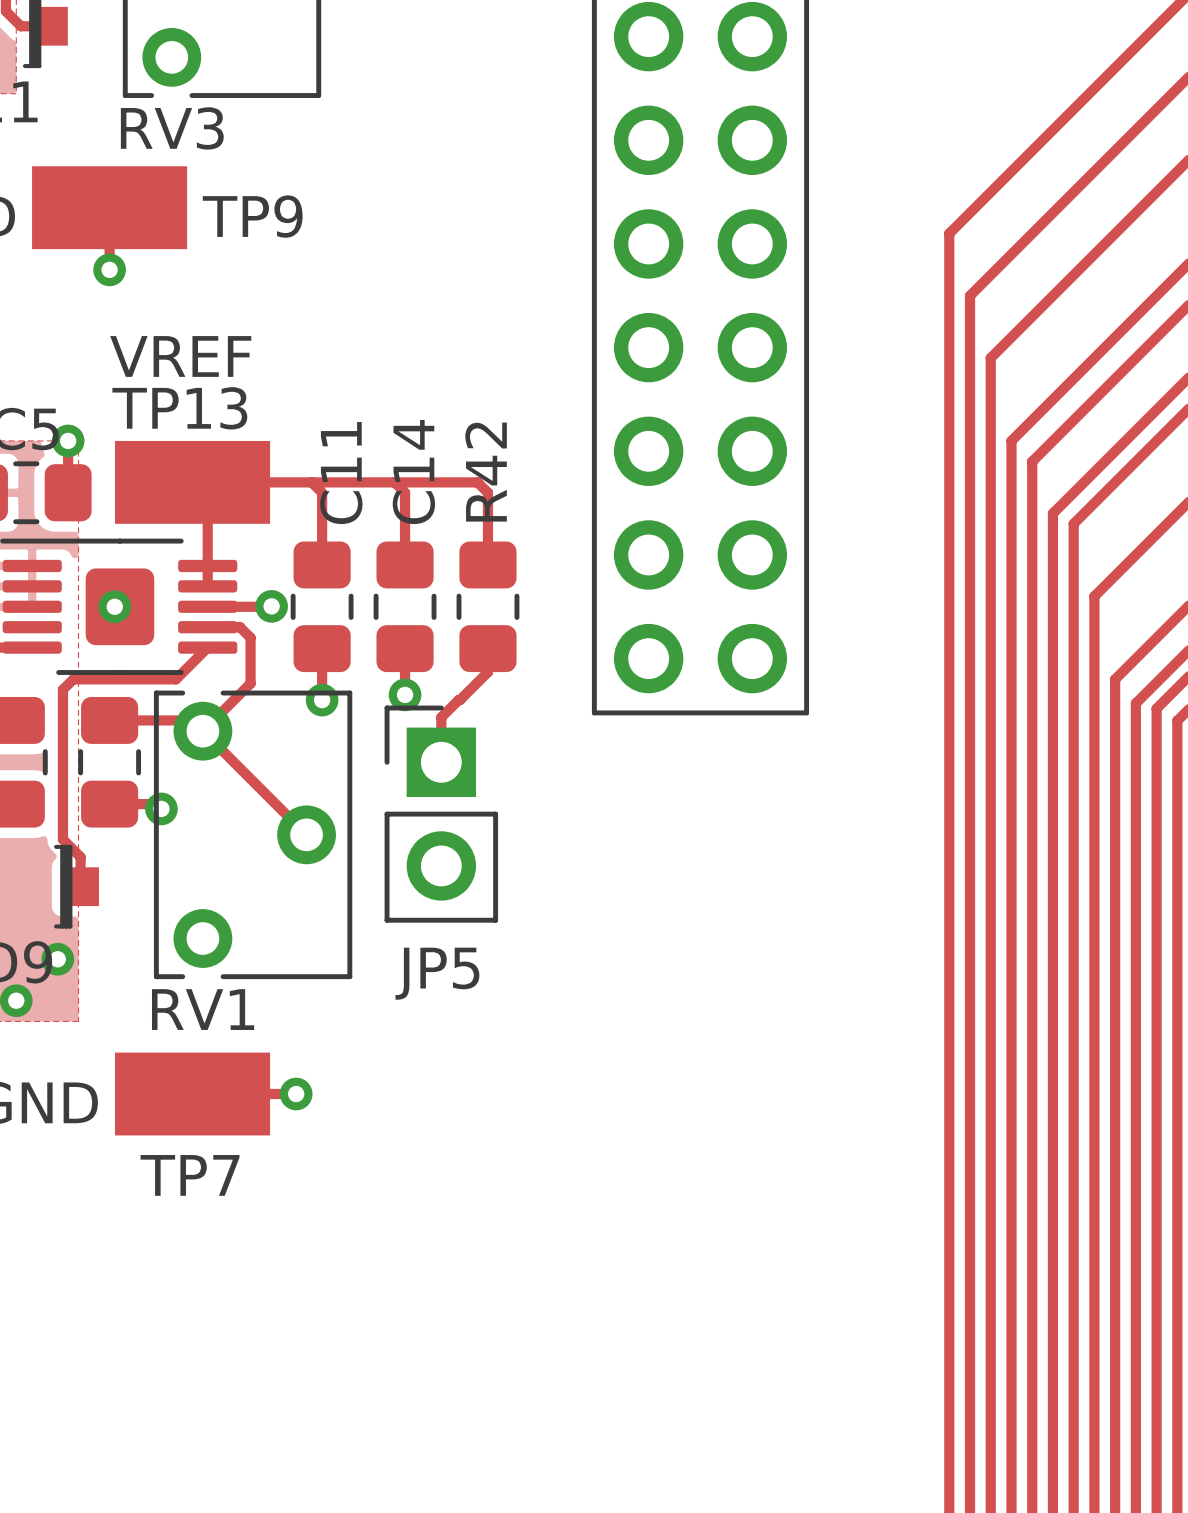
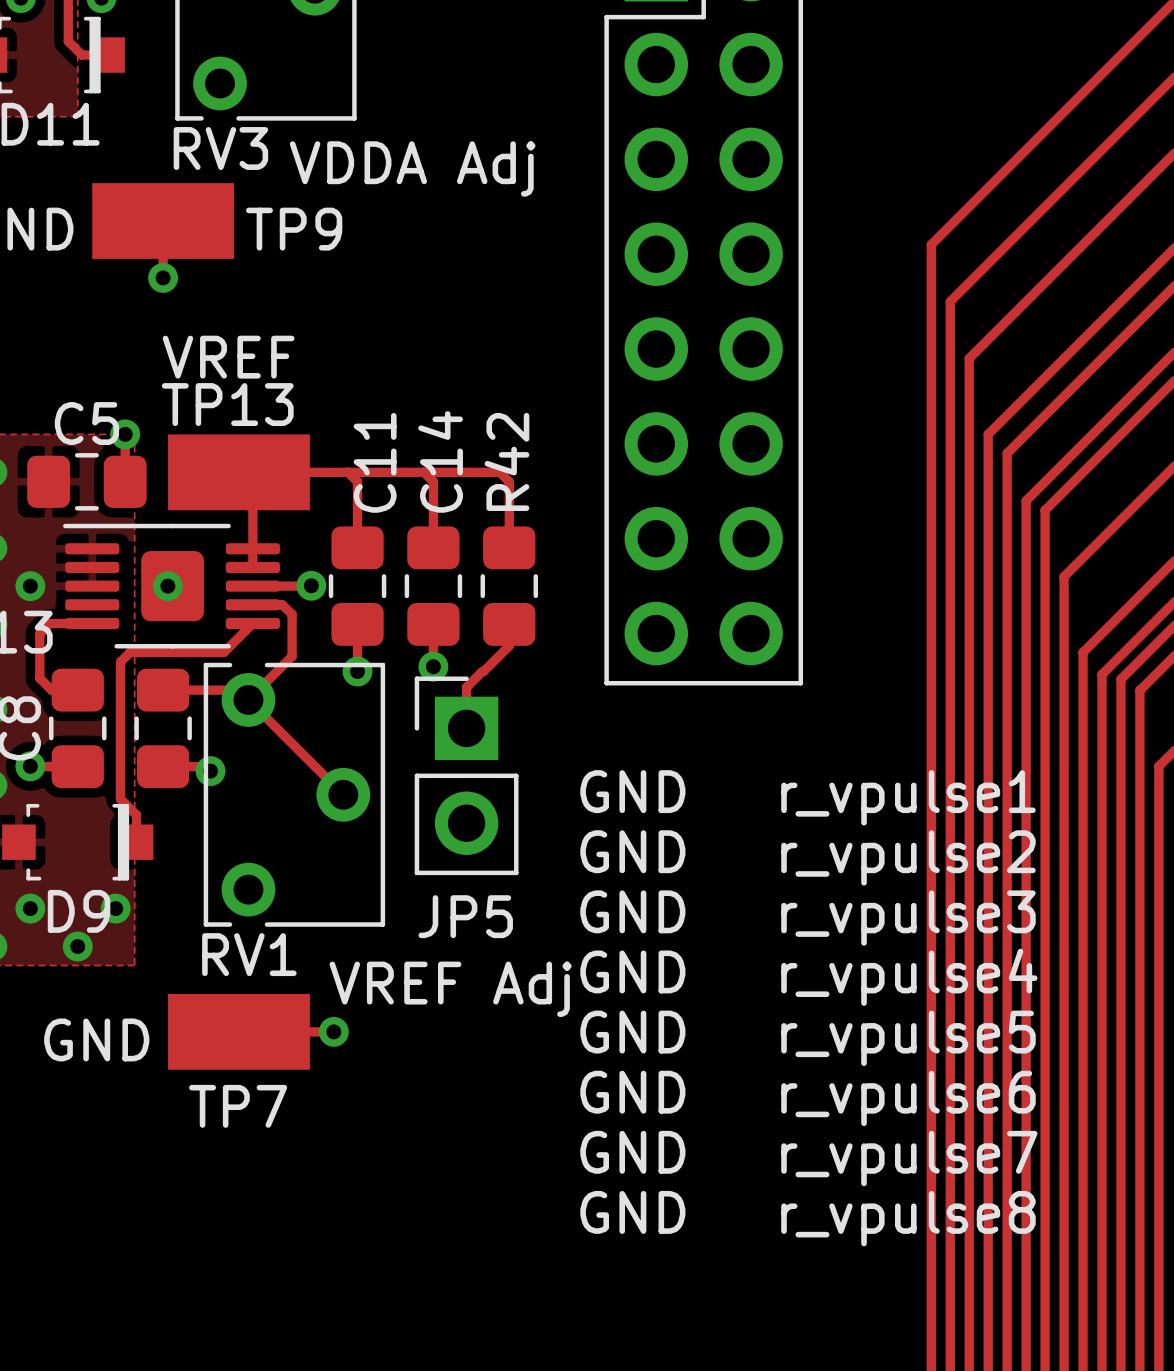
text: none -> VDDA Adj (412, 168)
text: none -> GND r_vpulse1 (808, 797)
text: none -> GND r_vpulse2 (808, 857)
text: none -> GND r_vpulse3 (808, 918)
text: none -> GND r_vpulse4 (808, 977)
text: none -> VREF Adj (450, 989)
text: none -> GND r_vpulse5 (808, 1038)
text: none -> GND r_vpulse6 (808, 1098)
text: none -> GND r_vpulse7 (808, 1158)
text: none -> GND r_vpulse8 (808, 1218)

